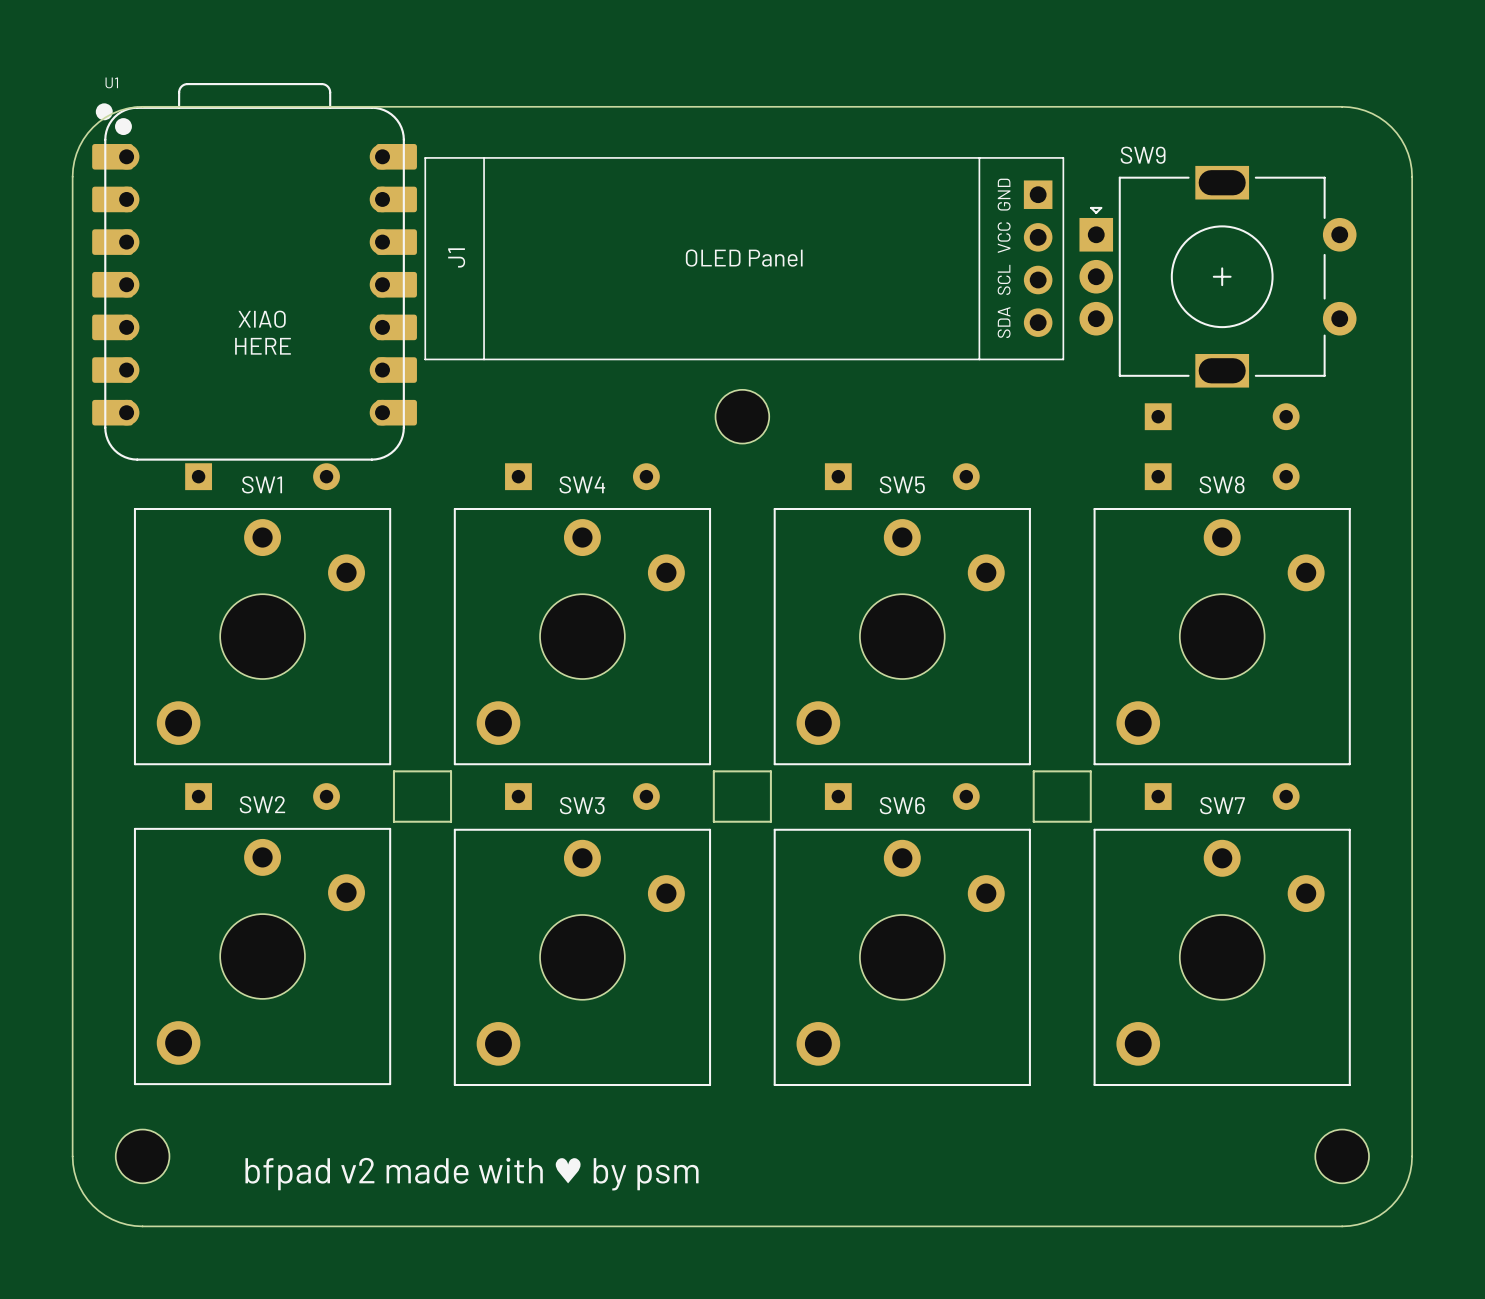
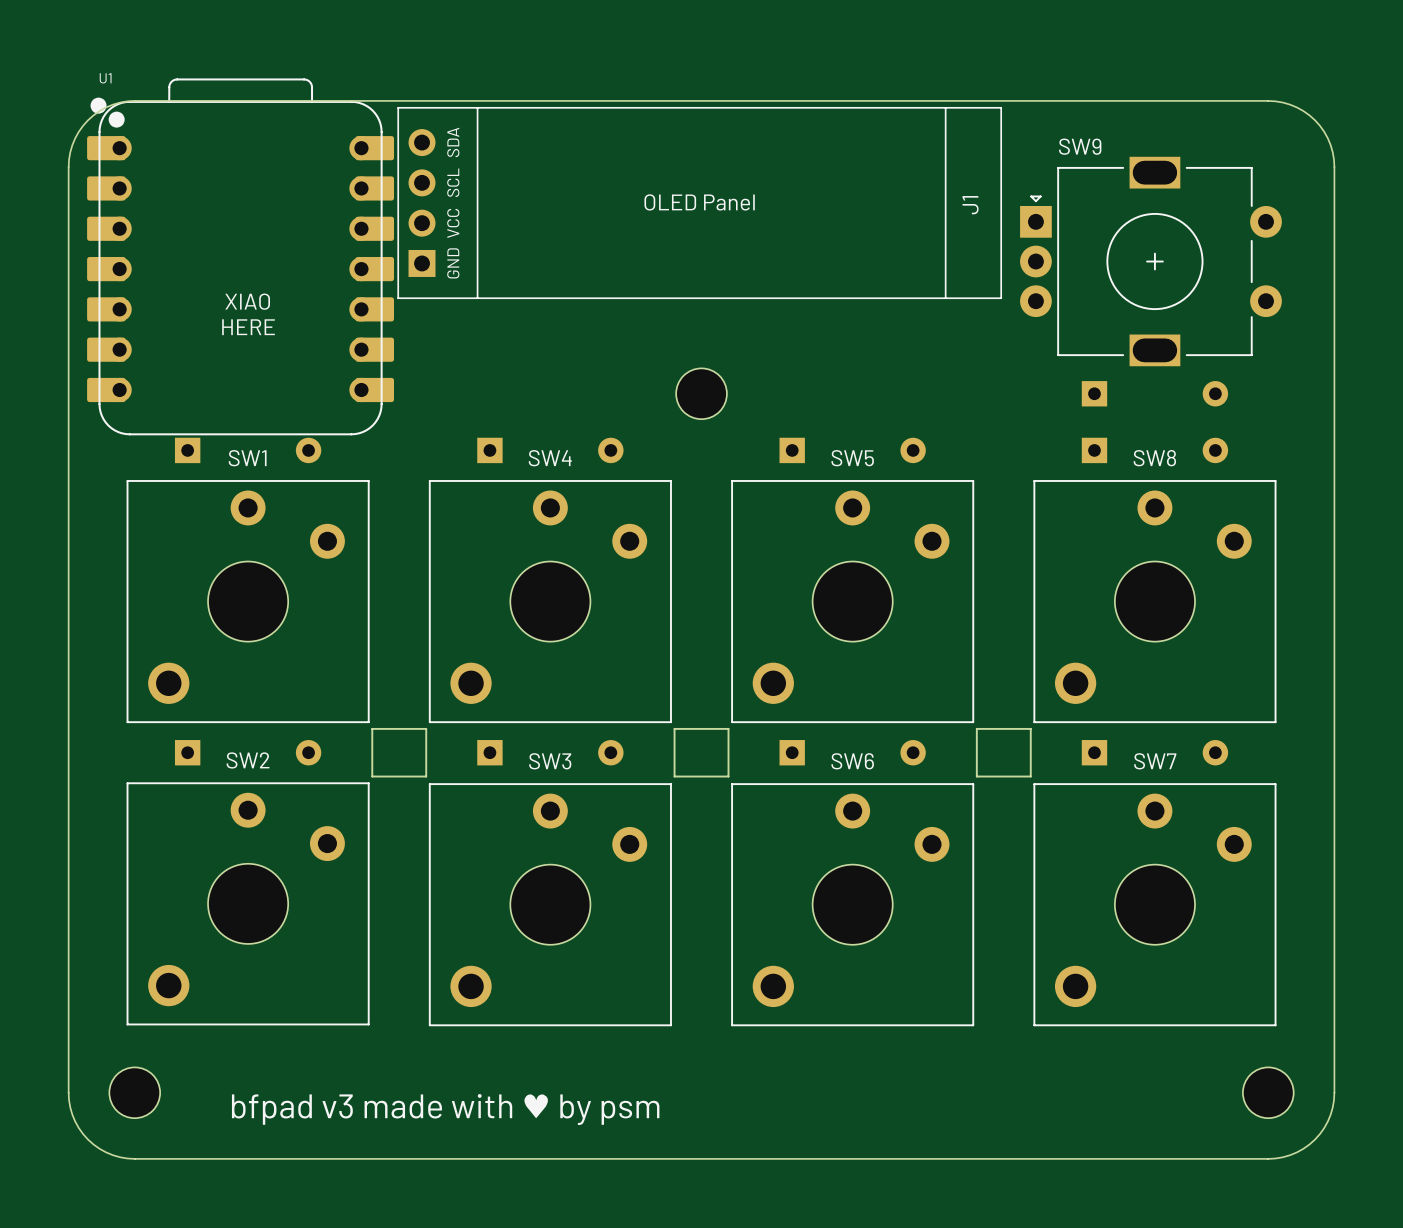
J1 rotation: 0° (744, 258) -> 180° (699, 203)
text: bfpad v2 made with ♥︎ by psm (472, 1174) -> bfpad v3 made with ♥︎ by psm (445, 1109)

